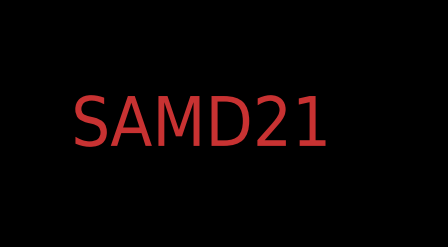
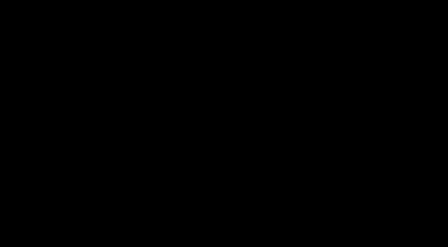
text: SAMD21 (200, 121) -> none

